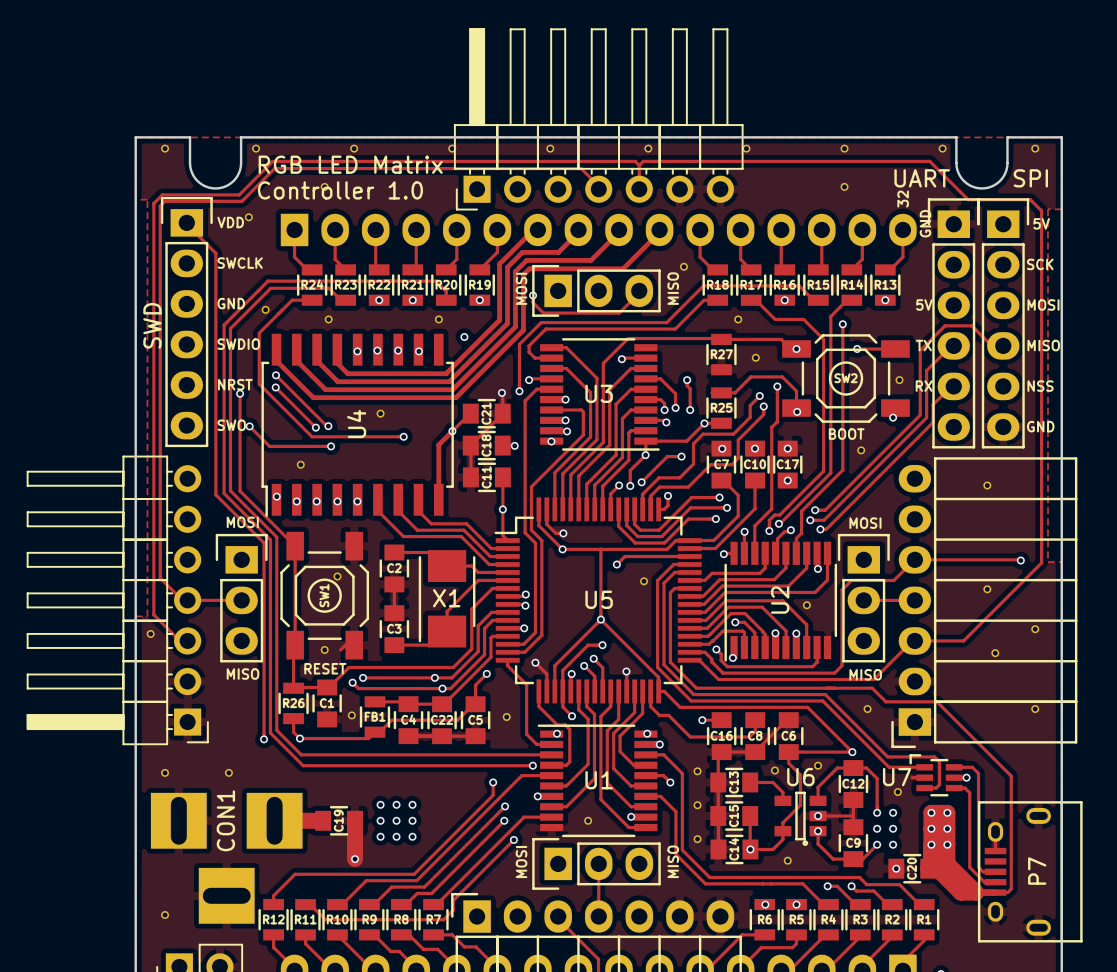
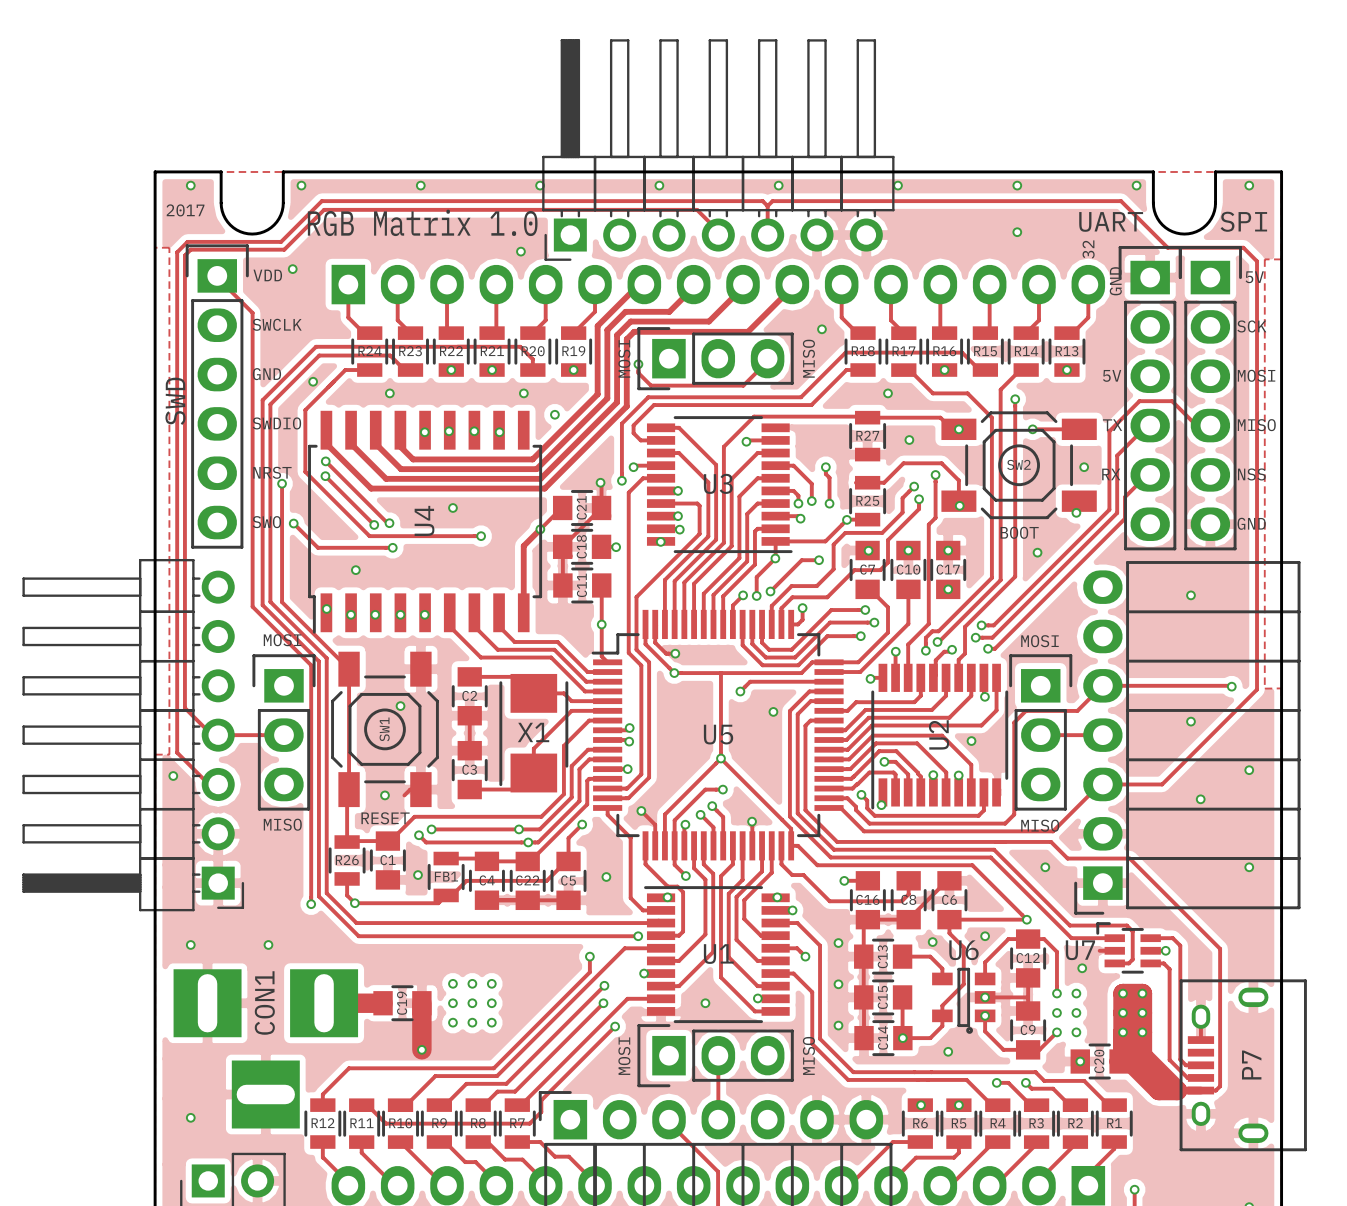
text: RGB LED Matrix (350, 164) -> RGB Matrix 1.0 (422, 222)
text: none -> 2017 (185, 210)
part position: (324, 186) -> (520, 251)
text: Controller 1.0 (340, 190) -> none

